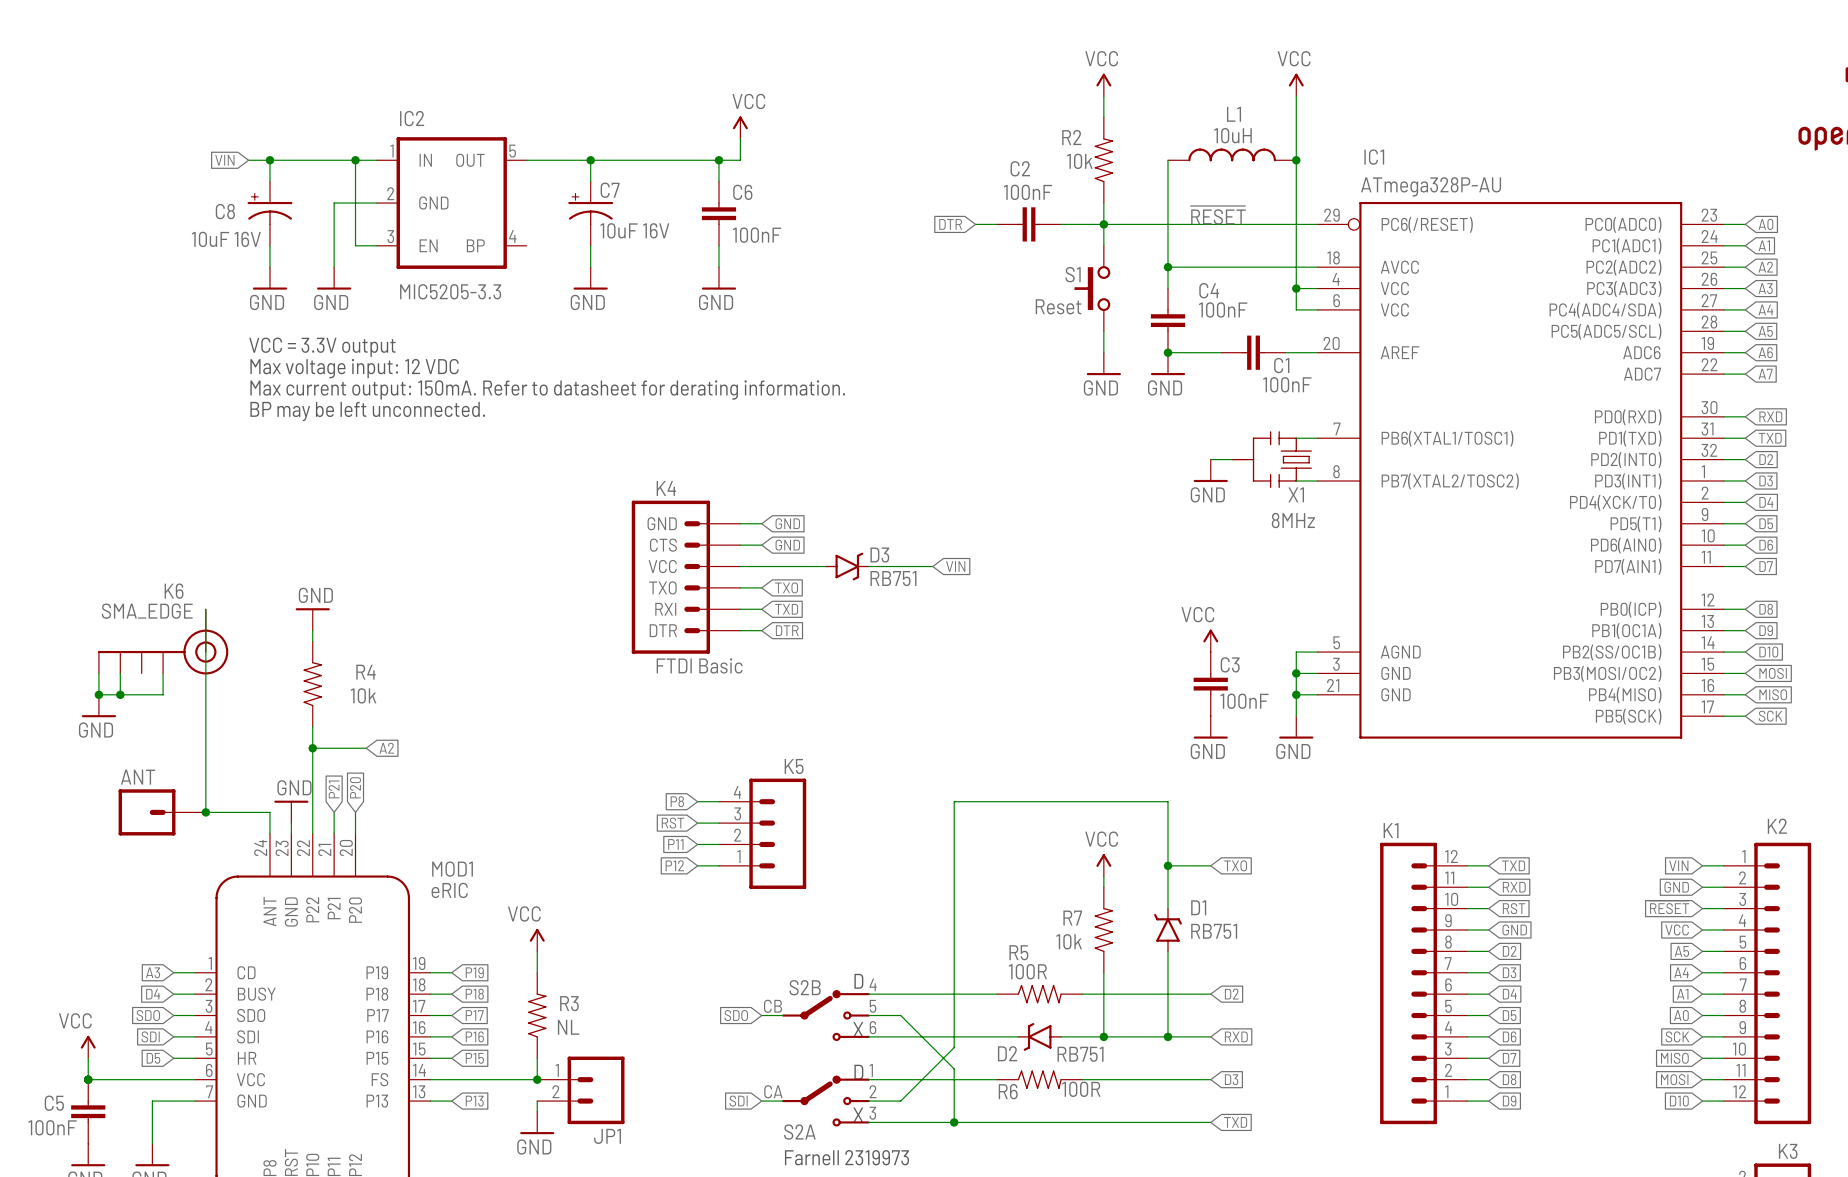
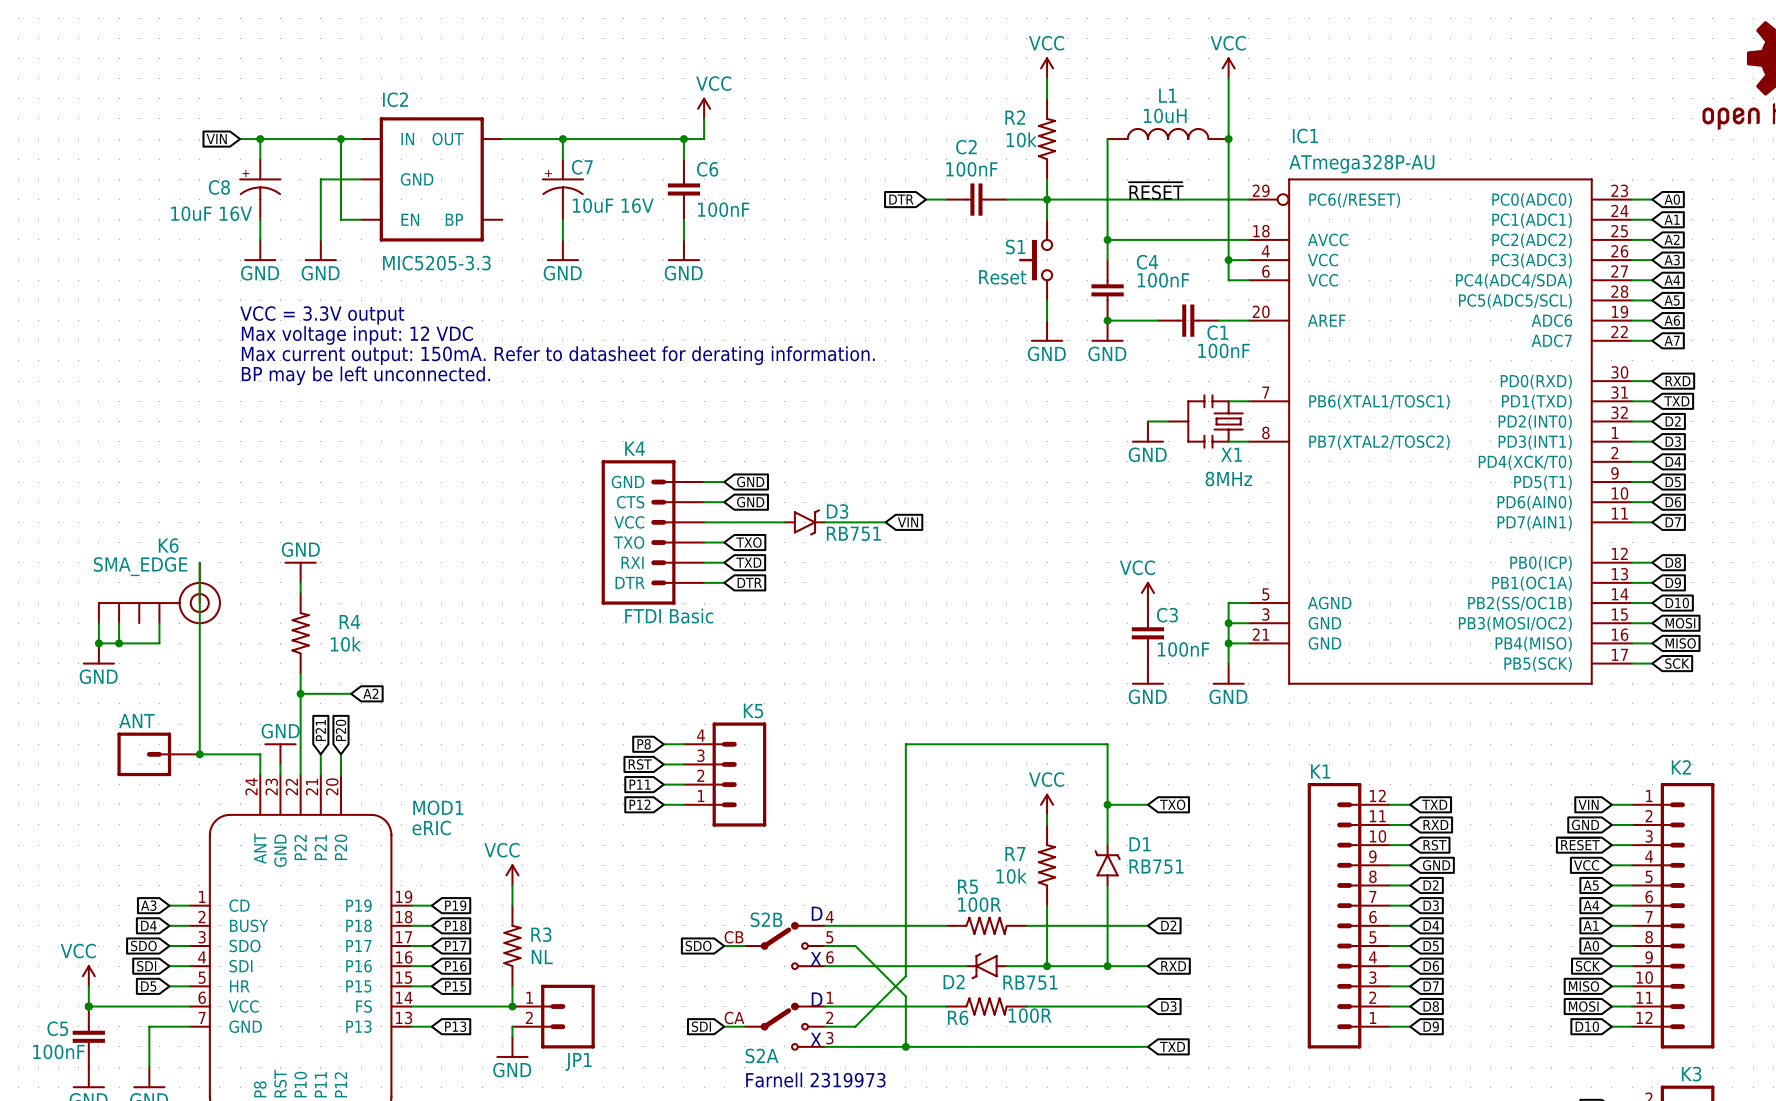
IC2 pin number: 1 (391, 151) -> none
IC2 pin number: 5 (512, 151) -> none
IC2 pin number: 2 (390, 193) -> none
IC2 pin number: 3 (390, 236) -> none
IC2 pin number: 4 (512, 236) -> none

